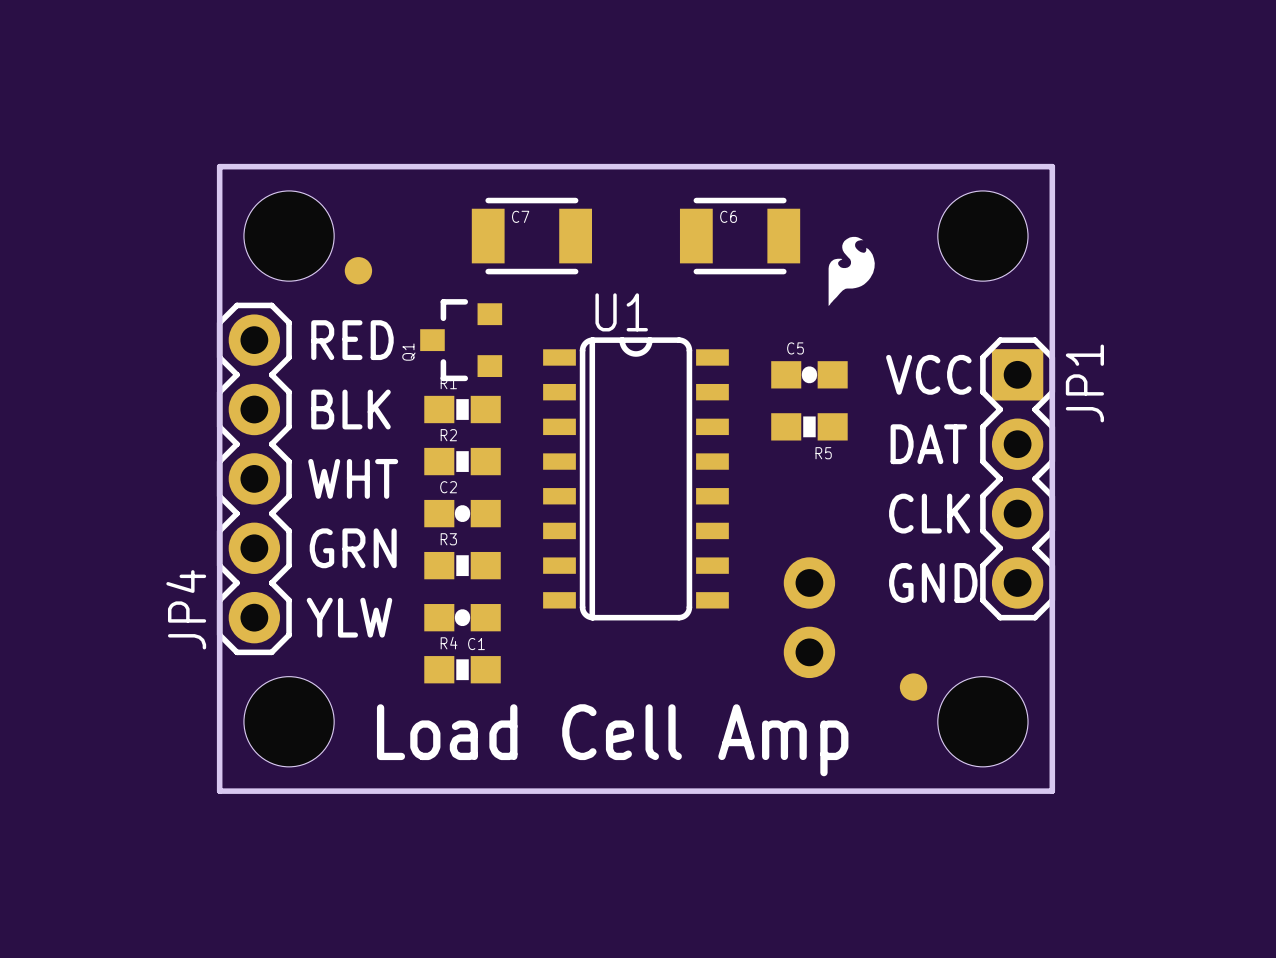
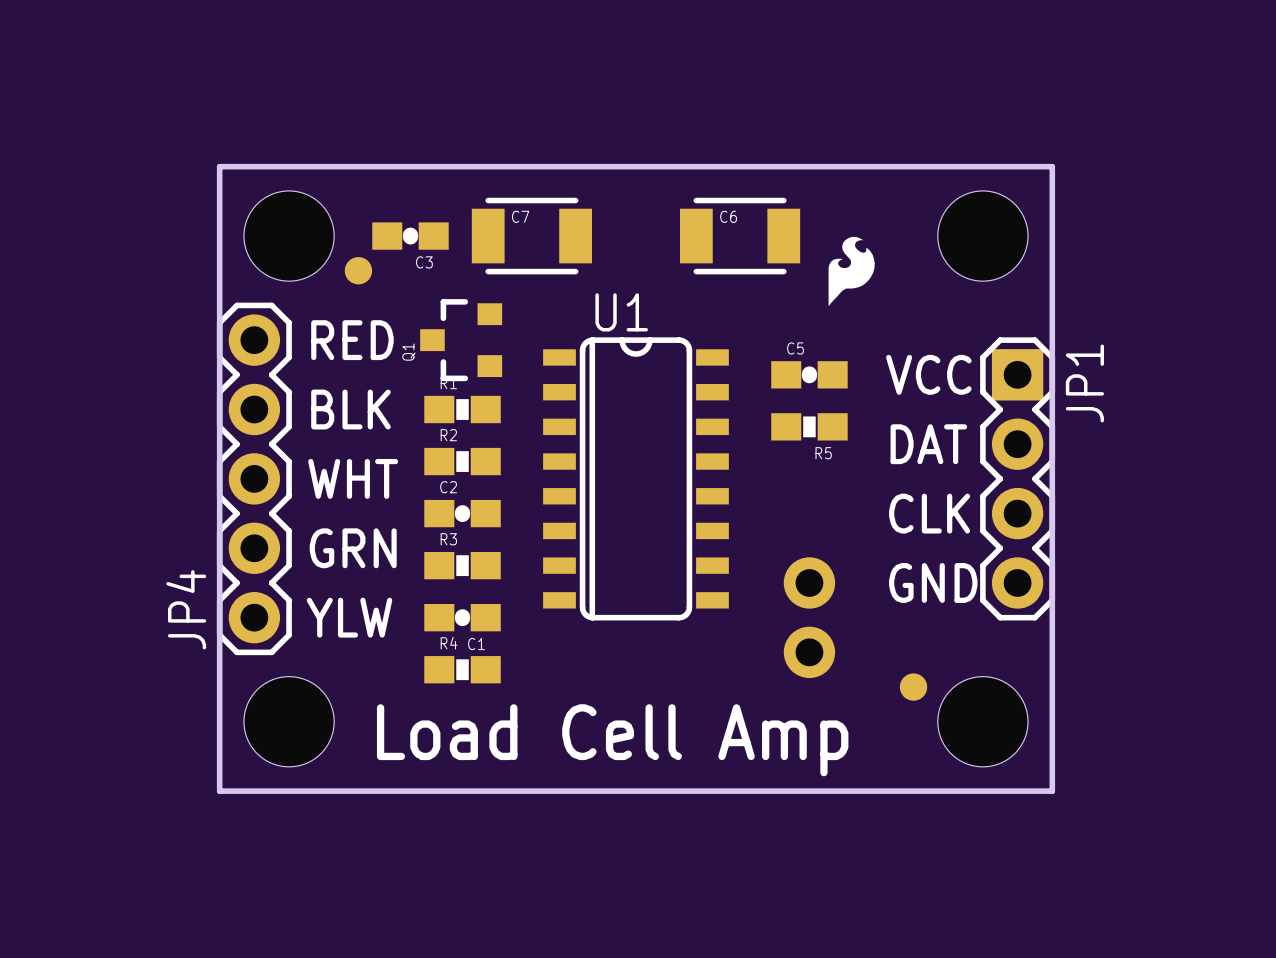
C3: none -> (410, 236)

